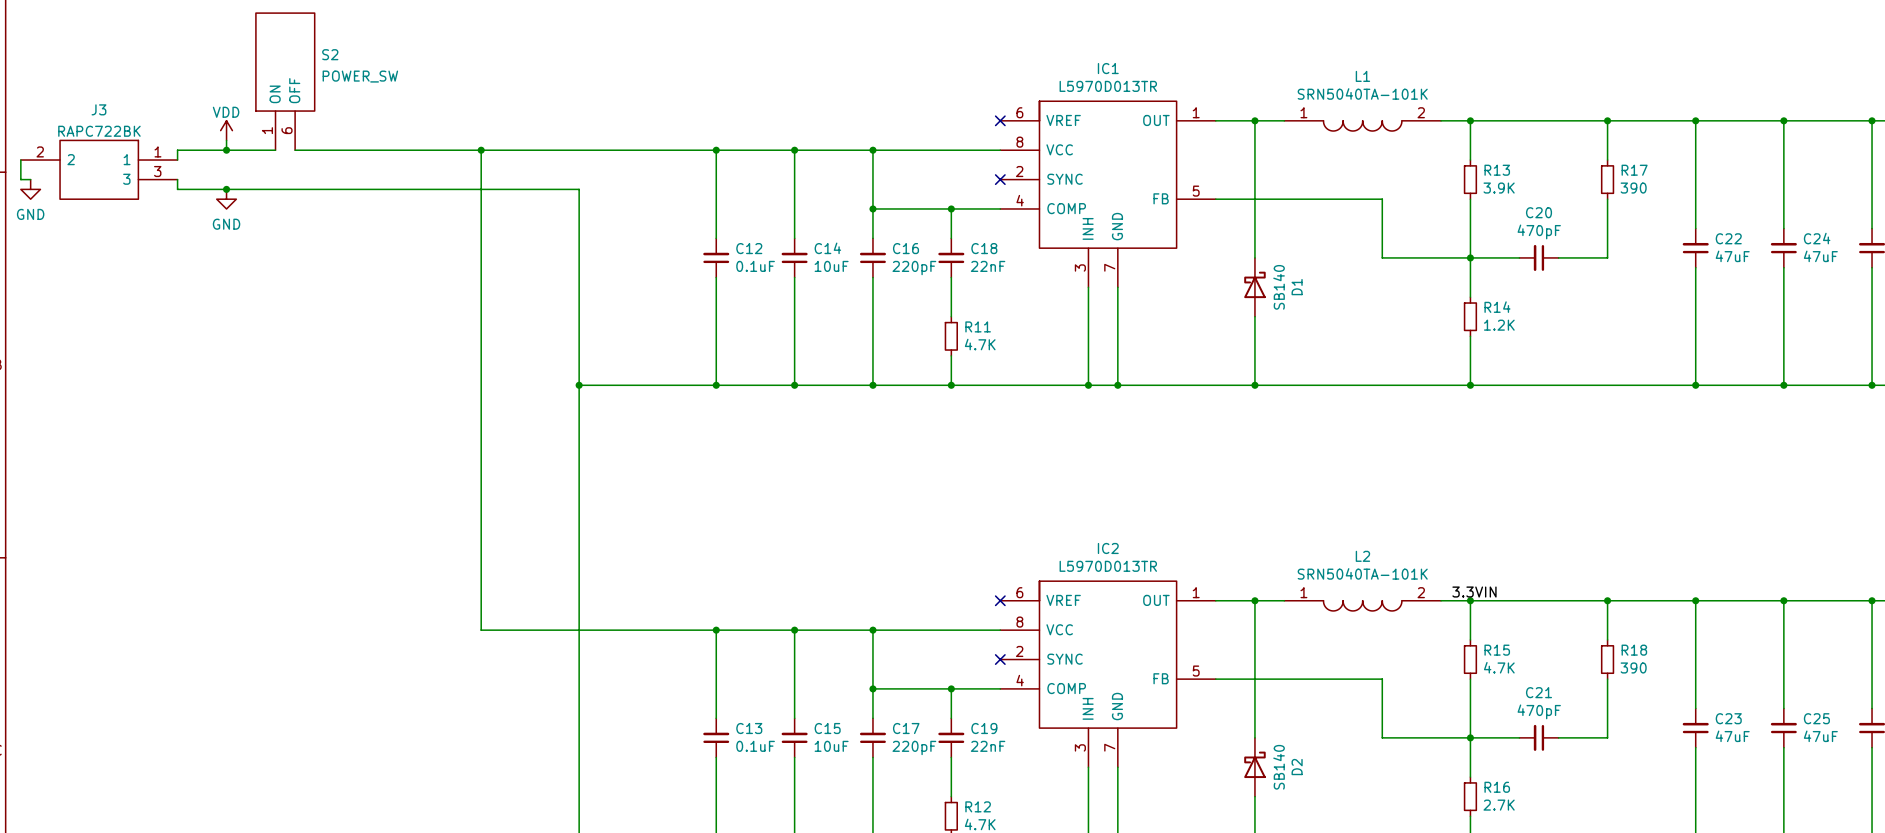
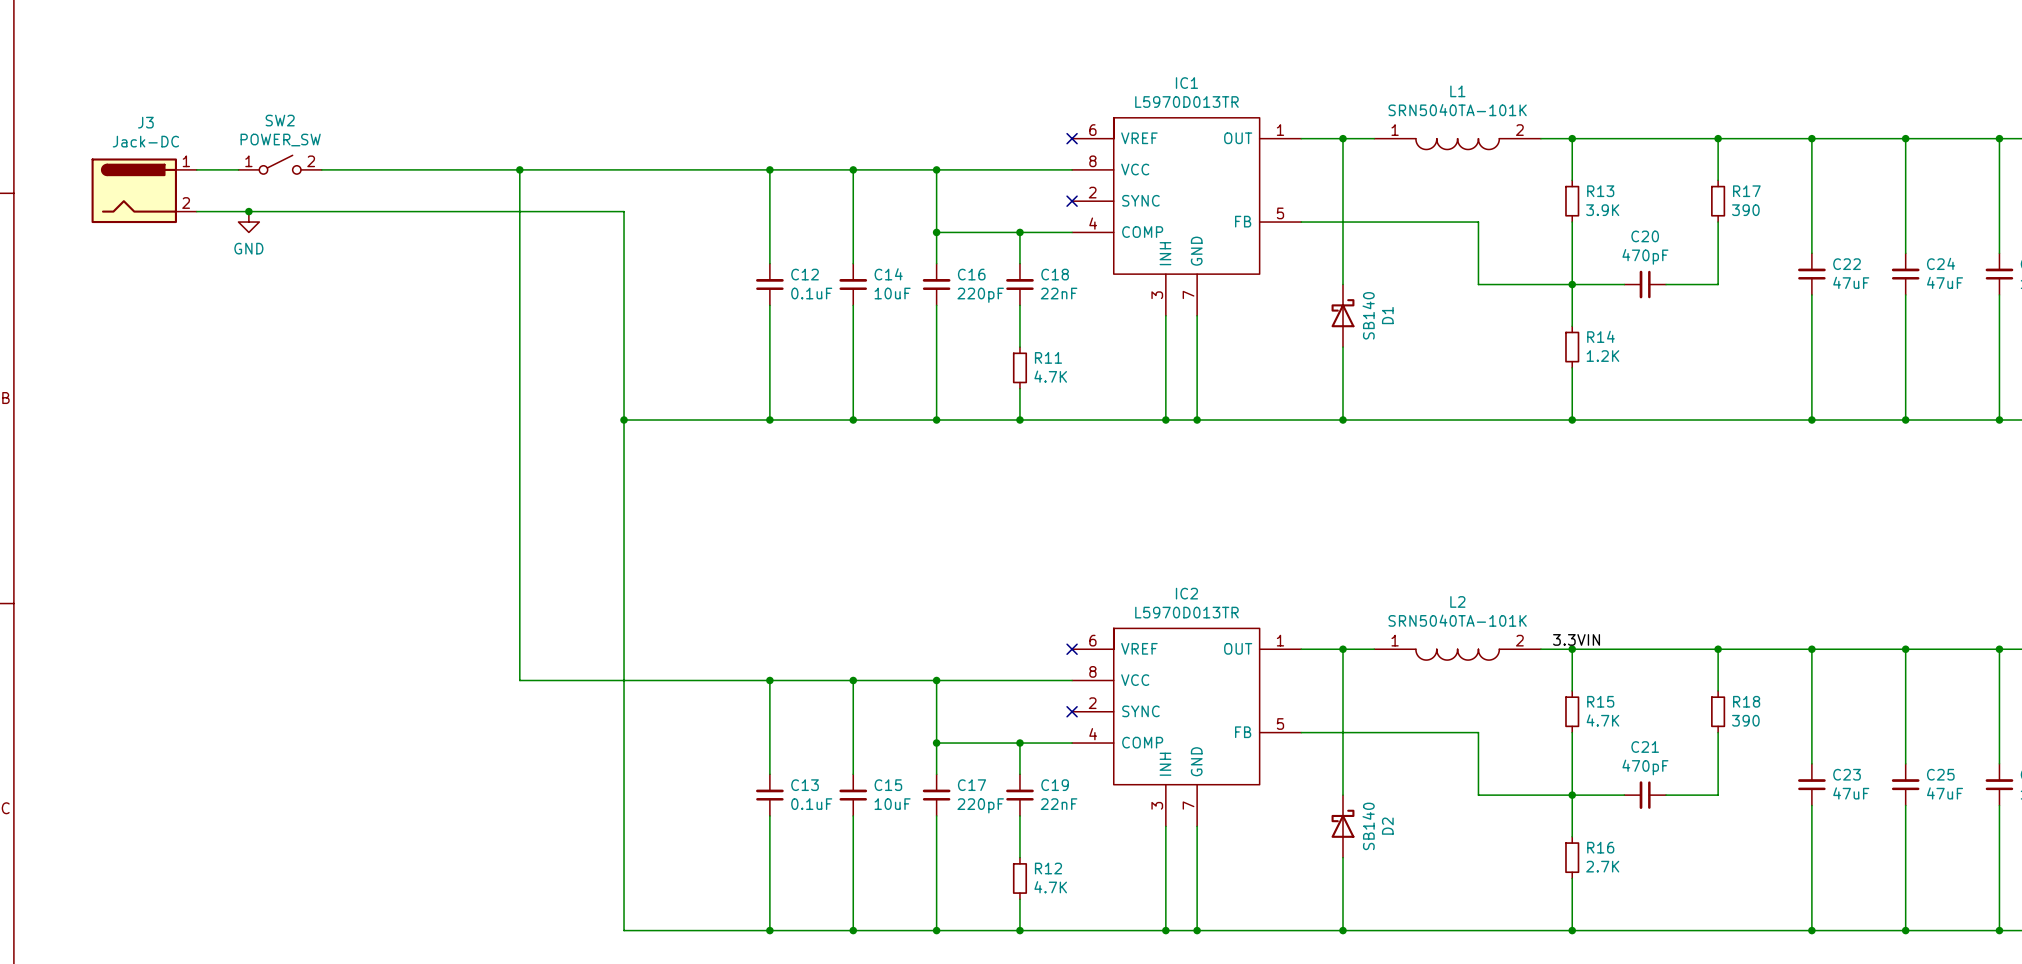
S2: POWER_SW (285, 81) -> none
power symbol: VDD (226, 130) -> none
J3 value: RAPC722BK (99, 131) -> Jack-DC (145, 141)
J3 symbol: [20, 139, 178, 200] -> [91, 158, 197, 224]
SW2: none -> POWER_SW (280, 164)
wire: (177, 150) (177, 160) -> none
wire: (216, 150) (275, 150) -> none
junction: (226, 150) -> none
wire: (20, 160) (20, 179) (30, 179) -> none
wire: (177, 179) (177, 189) -> none
power symbol: GND (30, 189) -> none

